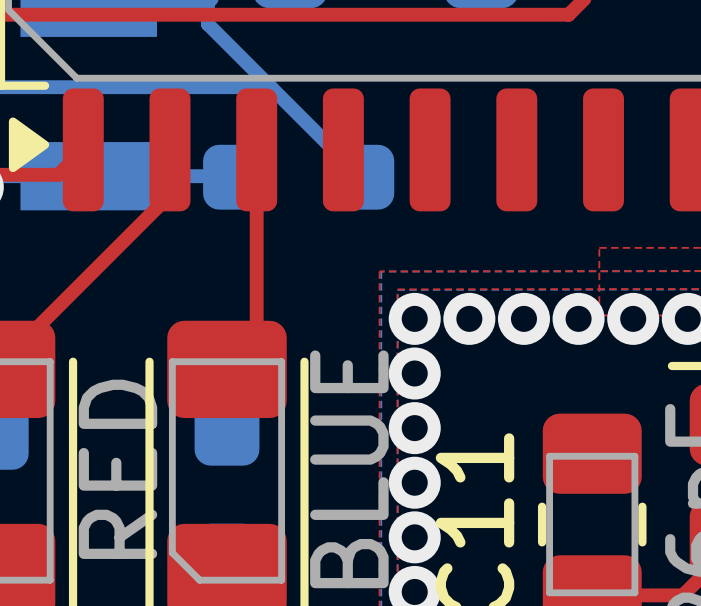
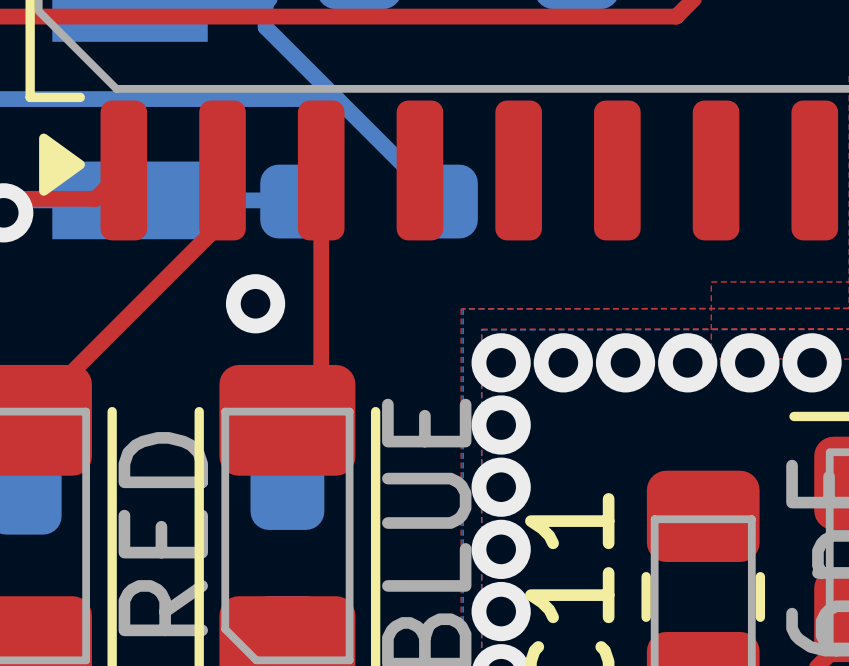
via: none -> (255, 303)

